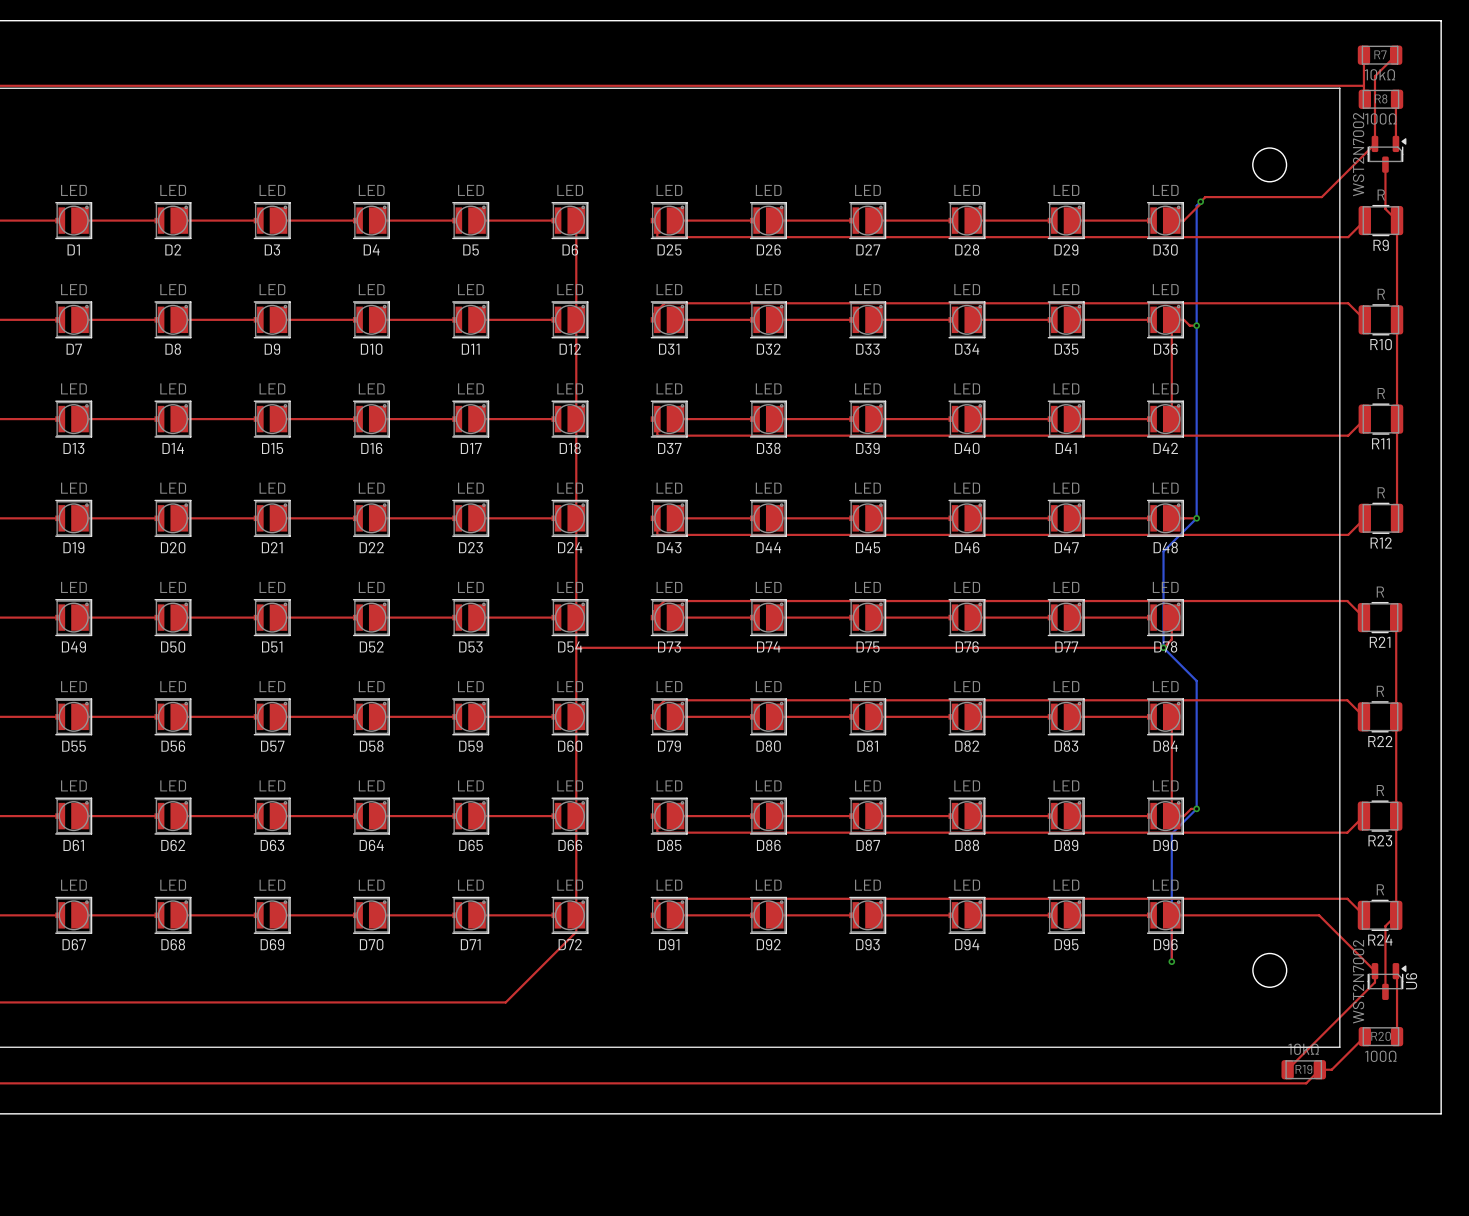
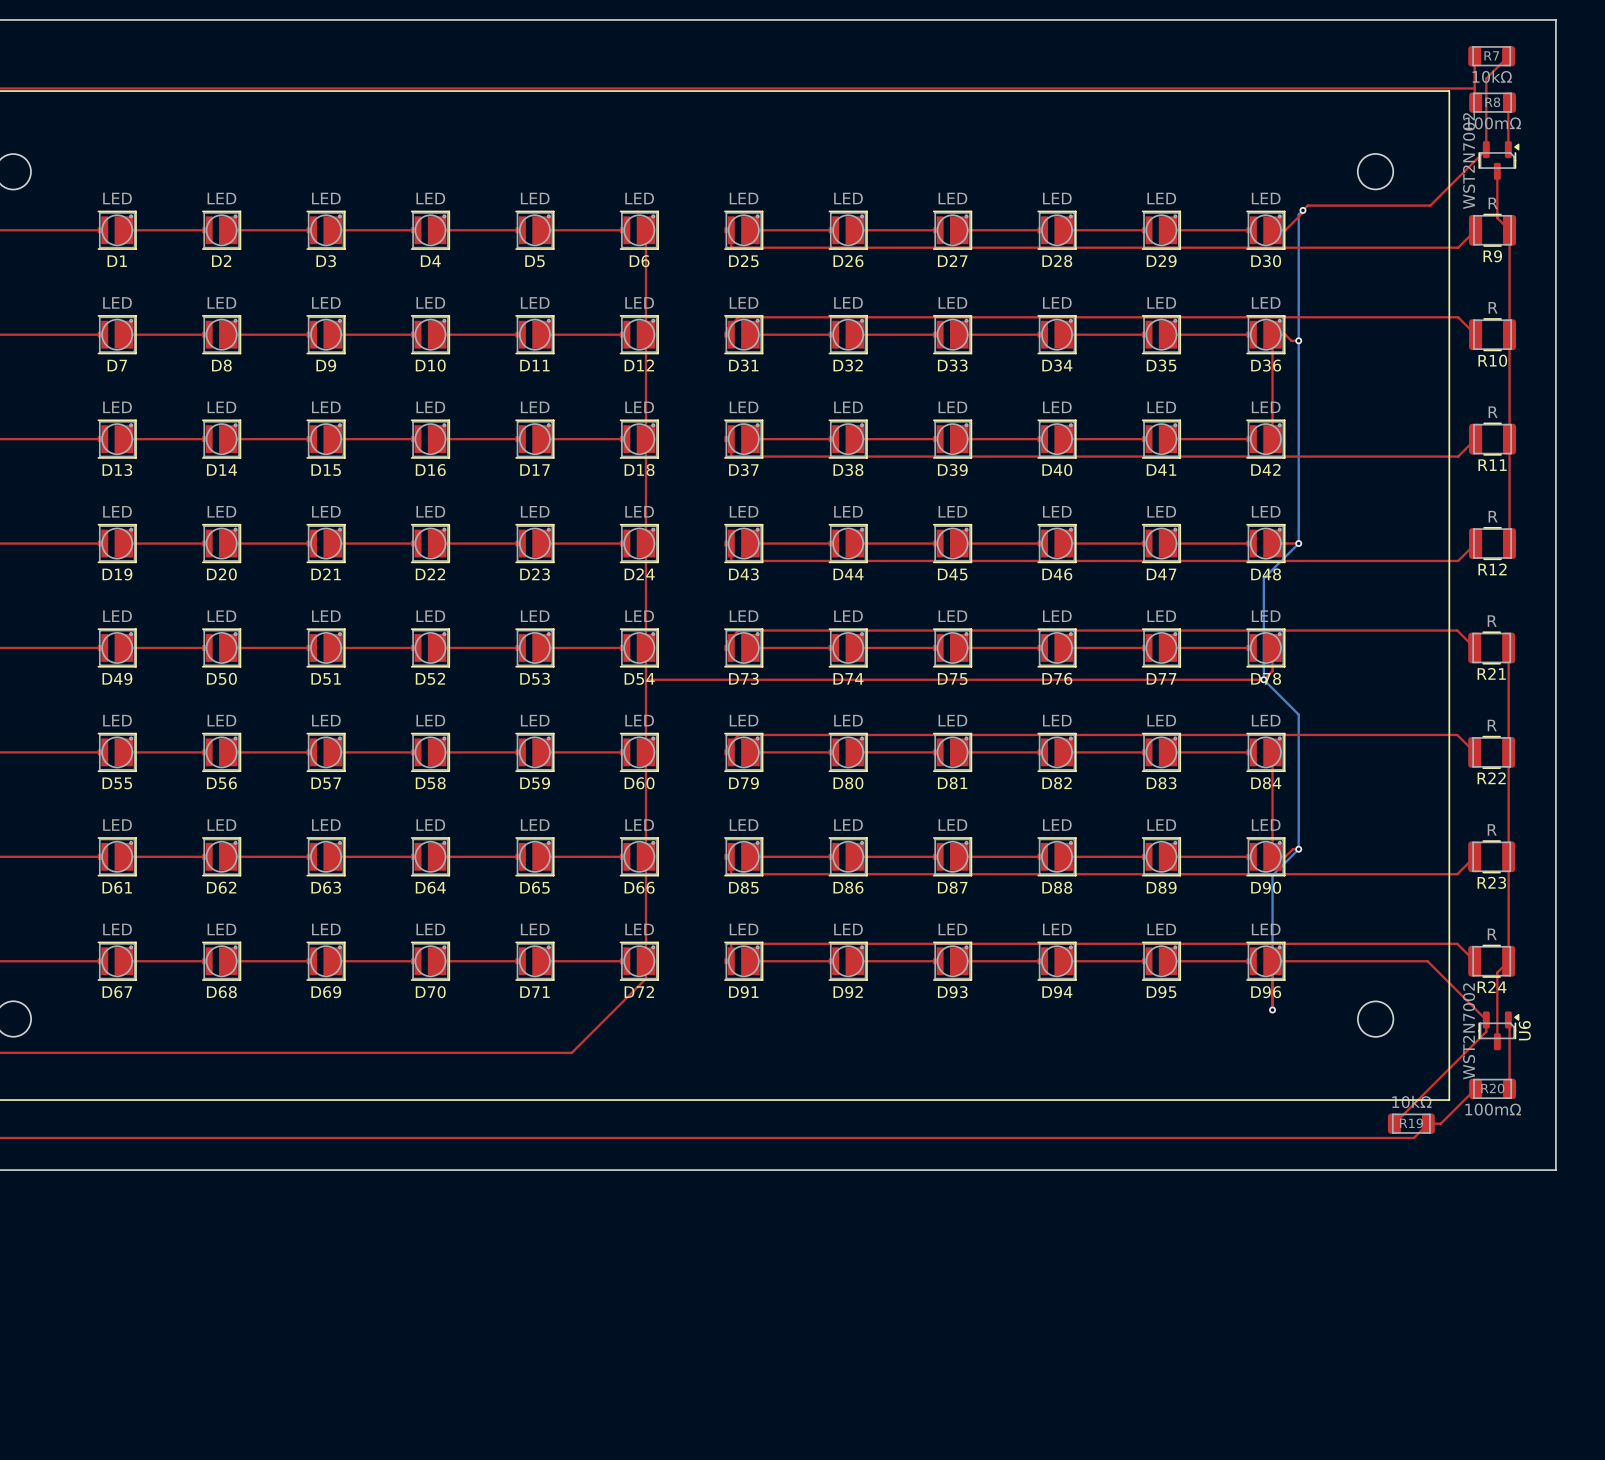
R8 value: 100Ω (1380, 118) -> 100mΩ (1493, 123)
R20 value: 100Ω (1380, 1056) -> 100mΩ (1493, 1109)

